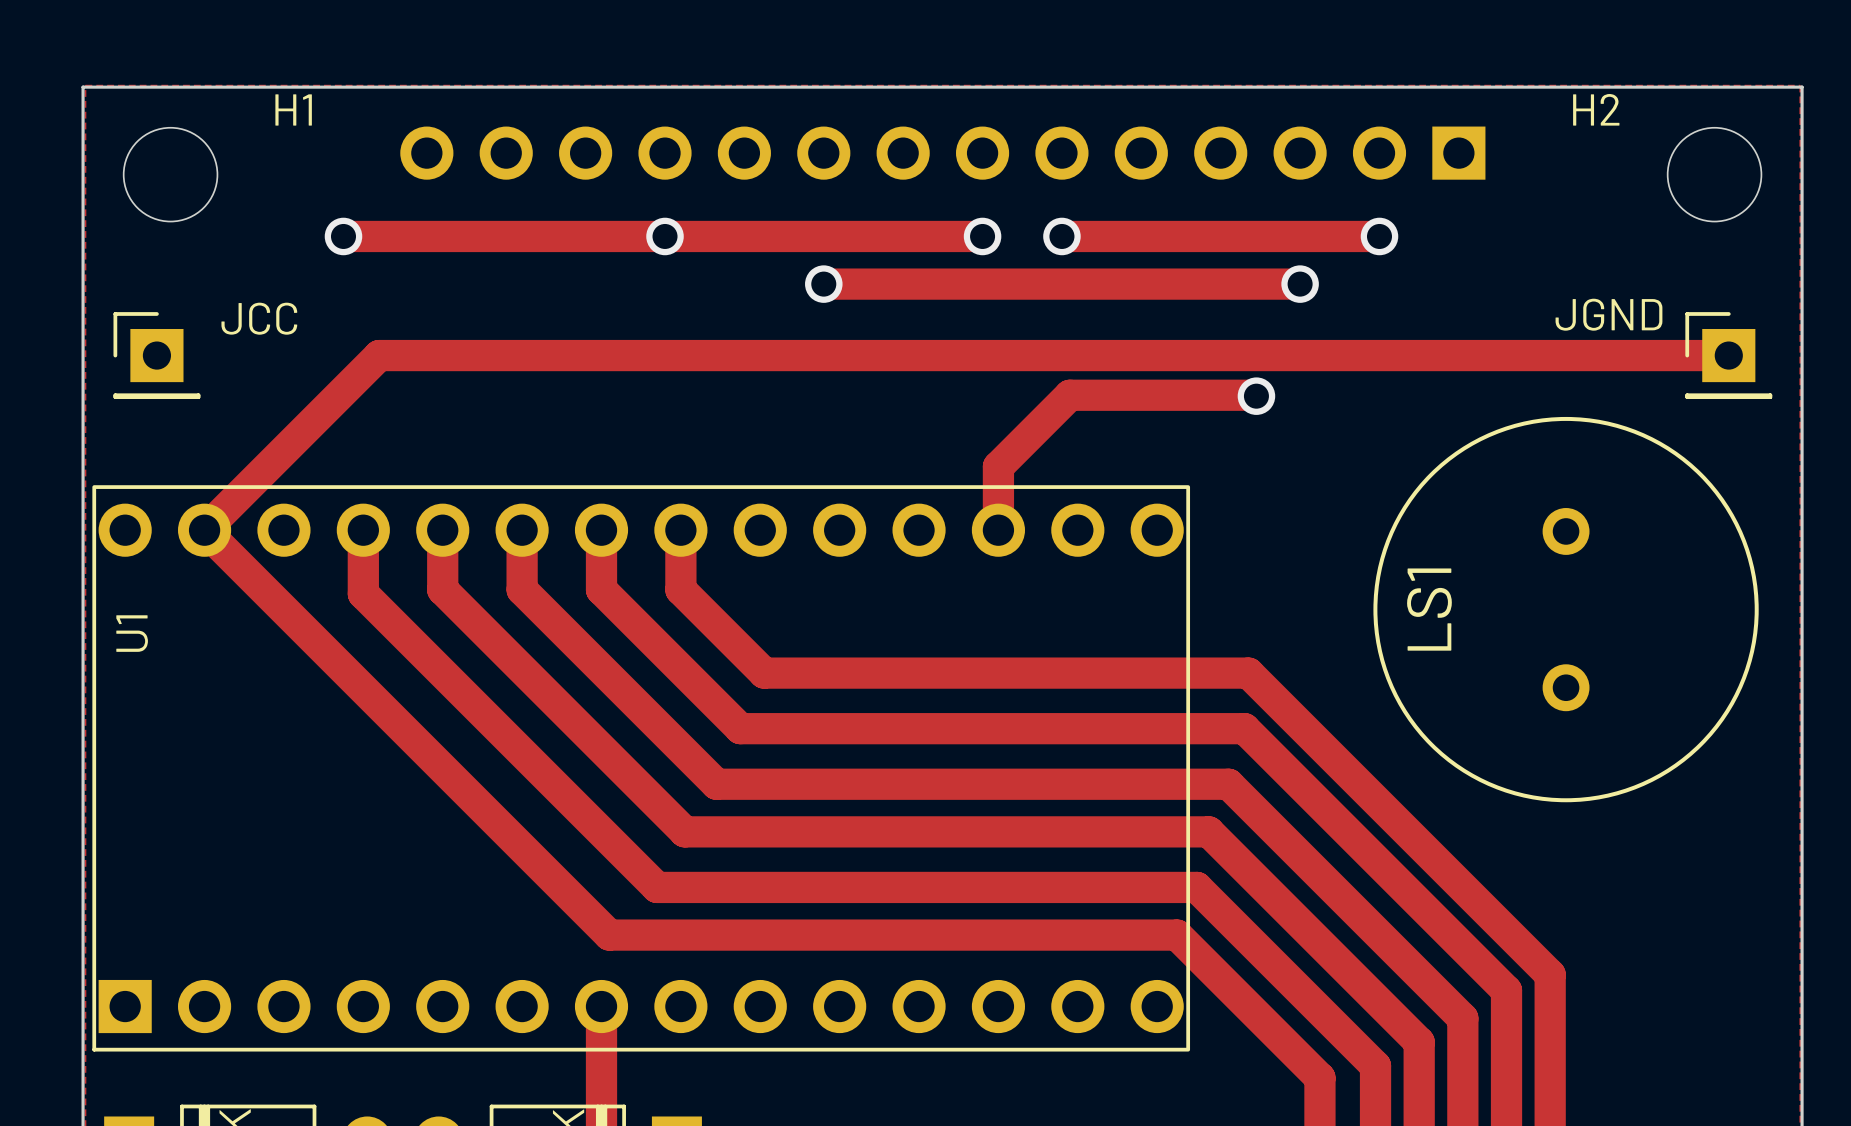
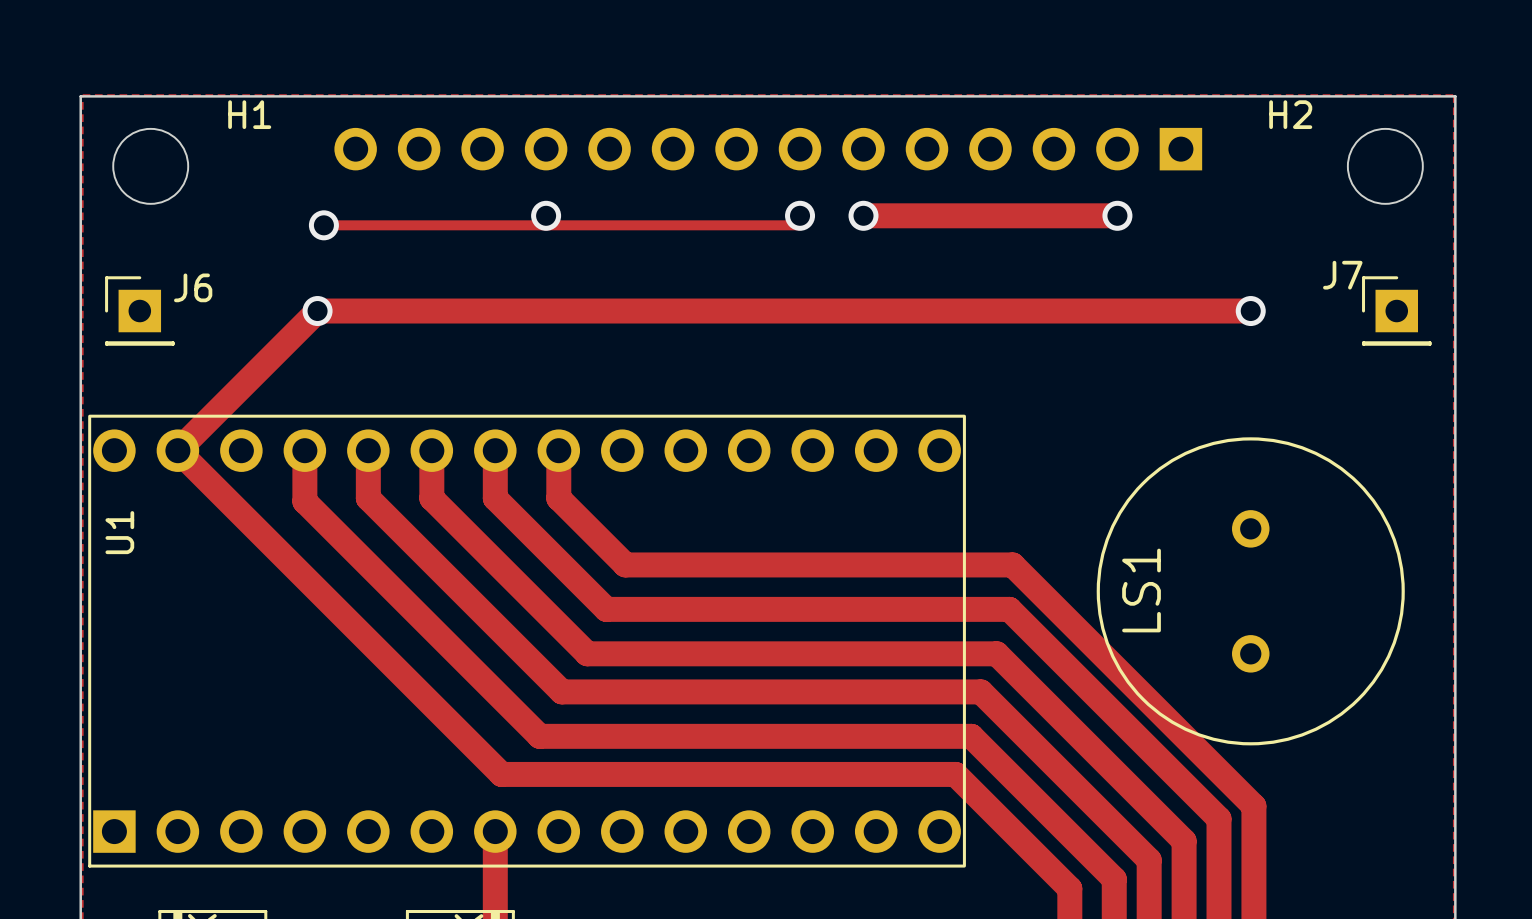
track: (343, 236) (982, 236) -> none
via position: (343, 236) -> (323, 225)
track: none -> (323, 225) (800, 225)
track: (823, 284) (1300, 284) -> none
via: (823, 284) -> none
via: (1300, 284) -> none
JGND name: JGND (1608, 314) -> J7 (1342, 275)
JCC name: JCC (259, 318) -> J6 (193, 287)
via: none -> (317, 311)
track: (1546, 355) (1728, 355) -> none
via: none -> (1250, 311)
track: (1256, 396) (1069, 395) (998, 466) (998, 530) -> none
via: (1256, 396) -> none
LS1 position: (1566, 609) -> (1250, 591)

